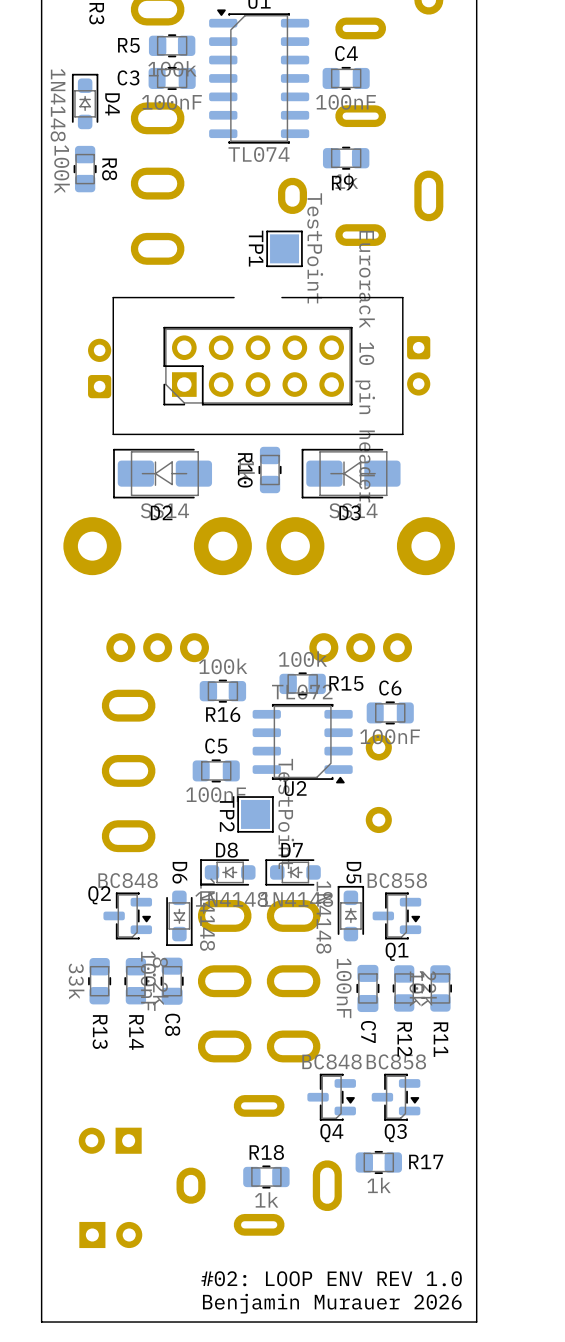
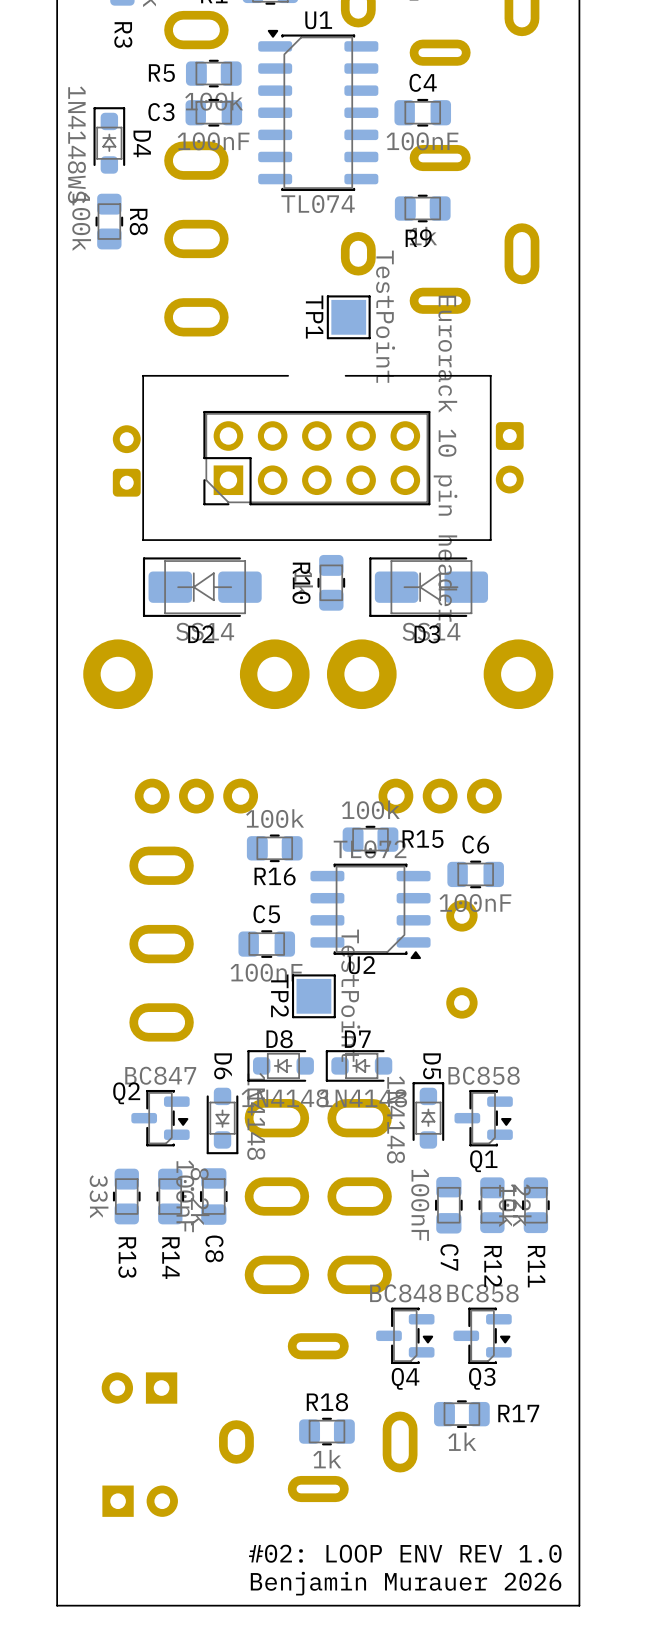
D4 value: 1N4148 (58, 105) -> 1N4148WS (76, 144)
Q2 value: BC848 (128, 880) -> BC847 (160, 1075)

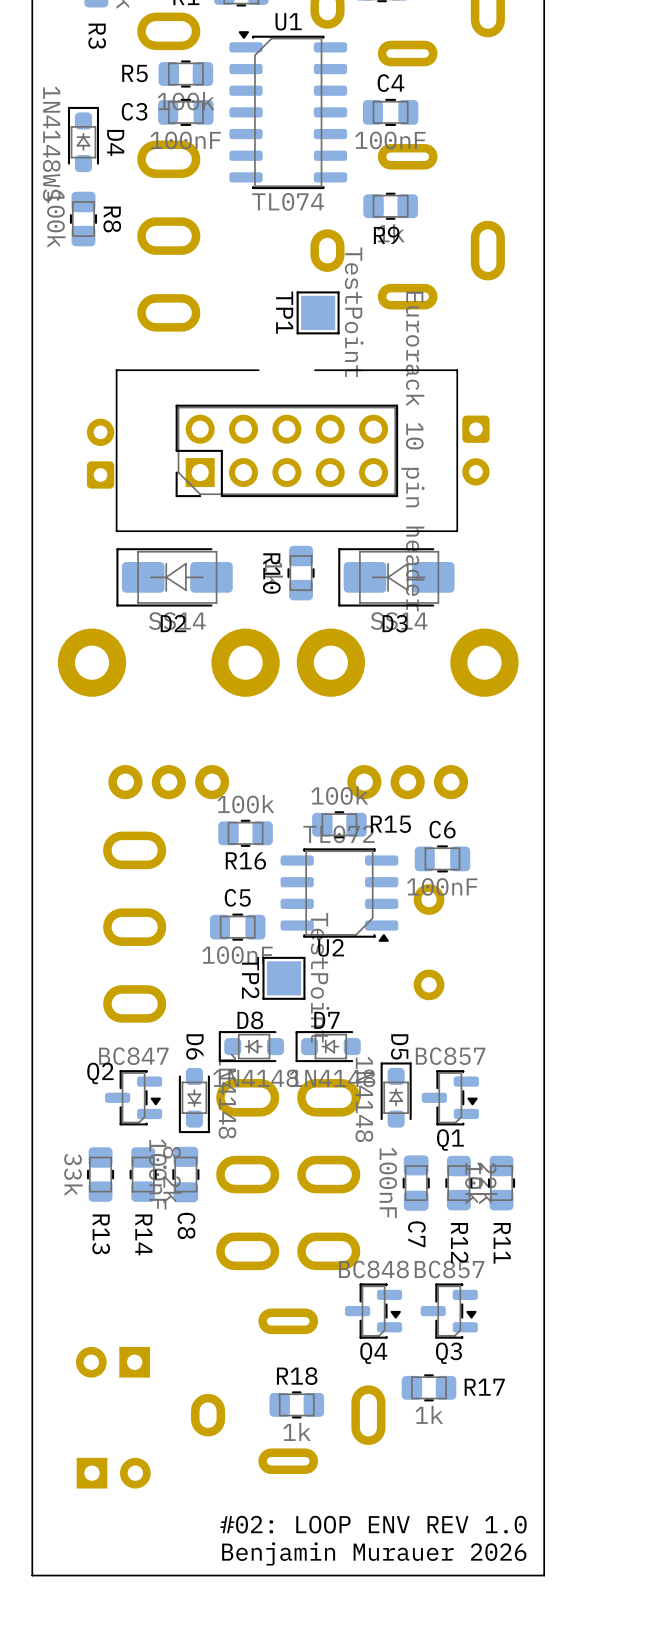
Q1 value: BC858 (484, 1075) -> BC857 (450, 1056)
Q3 value: BC858 (482, 1293) -> BC857 (449, 1269)

